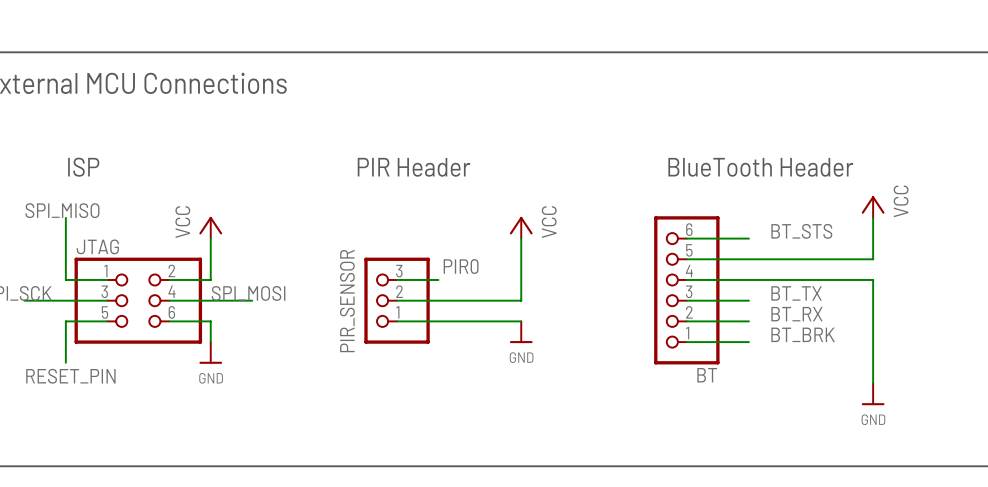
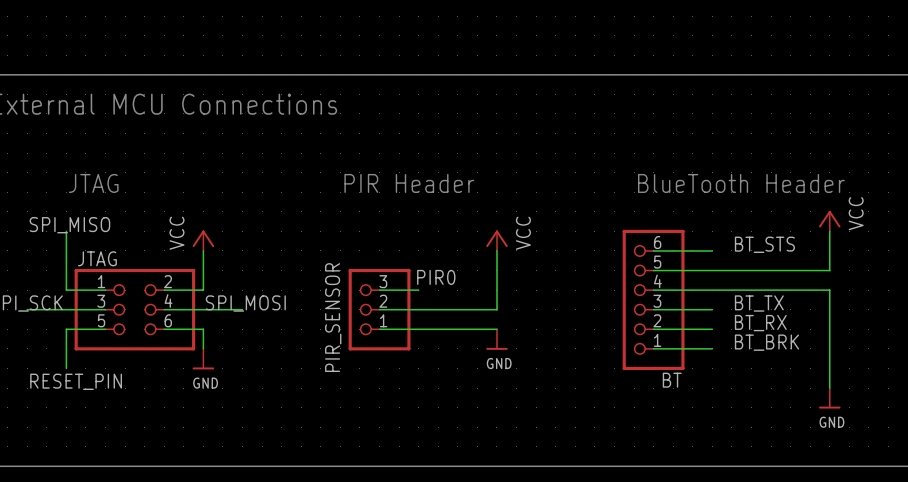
text: ISP (83, 167) -> JTAG (93, 183)

